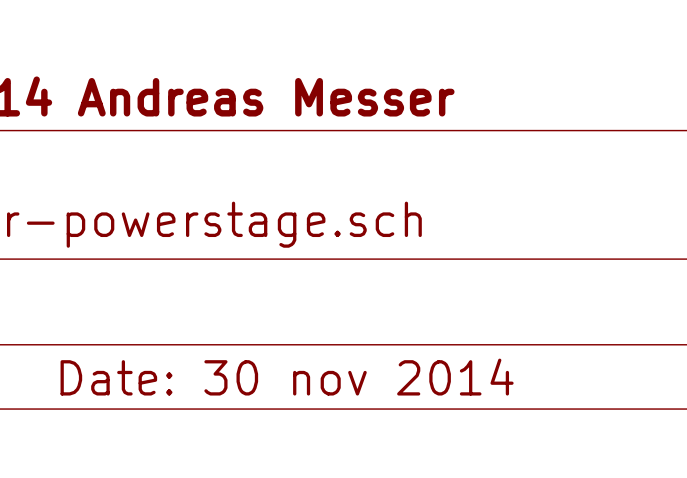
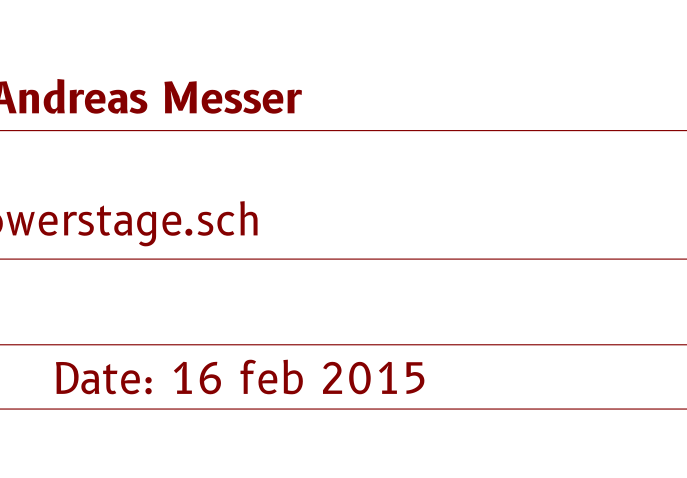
title block: Date: 30 nov 2014 (287, 377) -> Date: 16 feb 2015 (240, 376)

